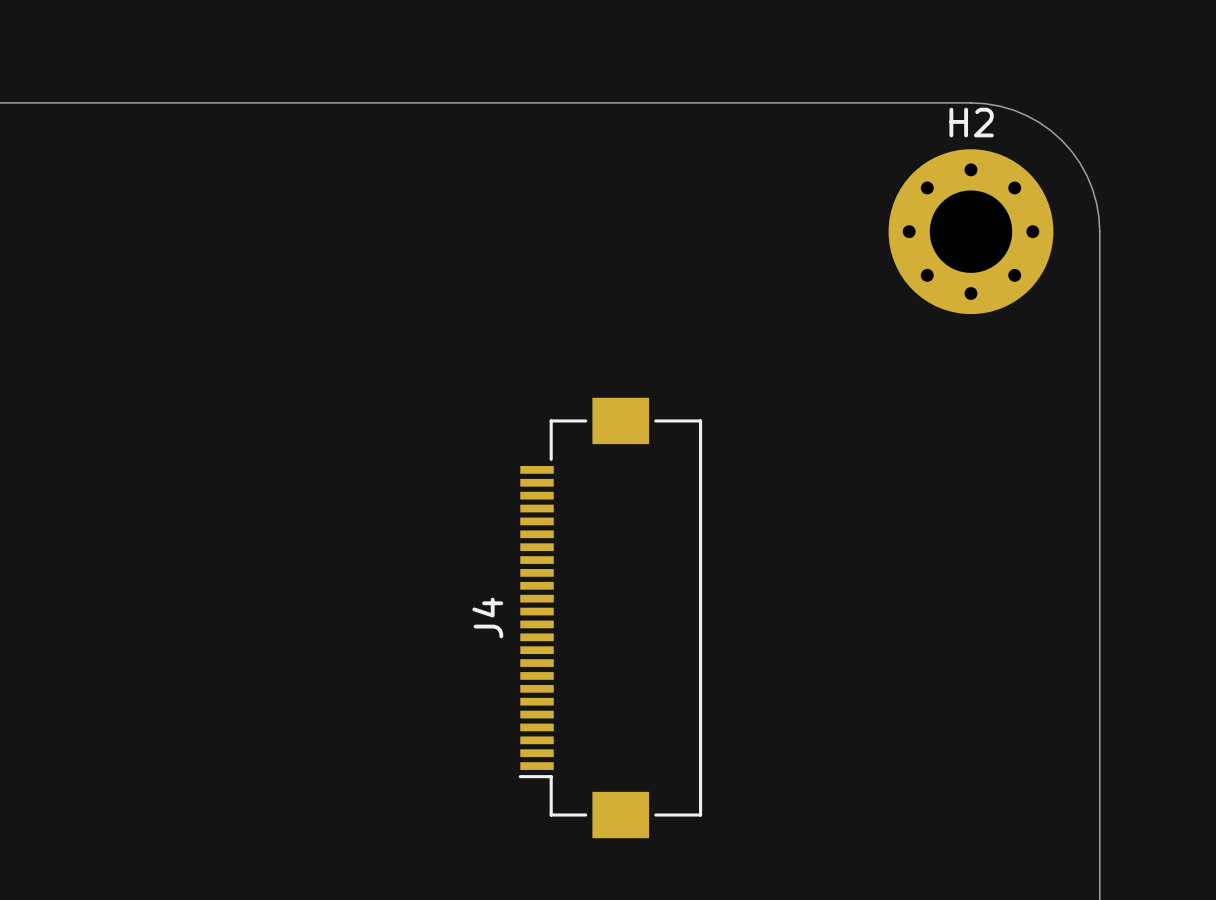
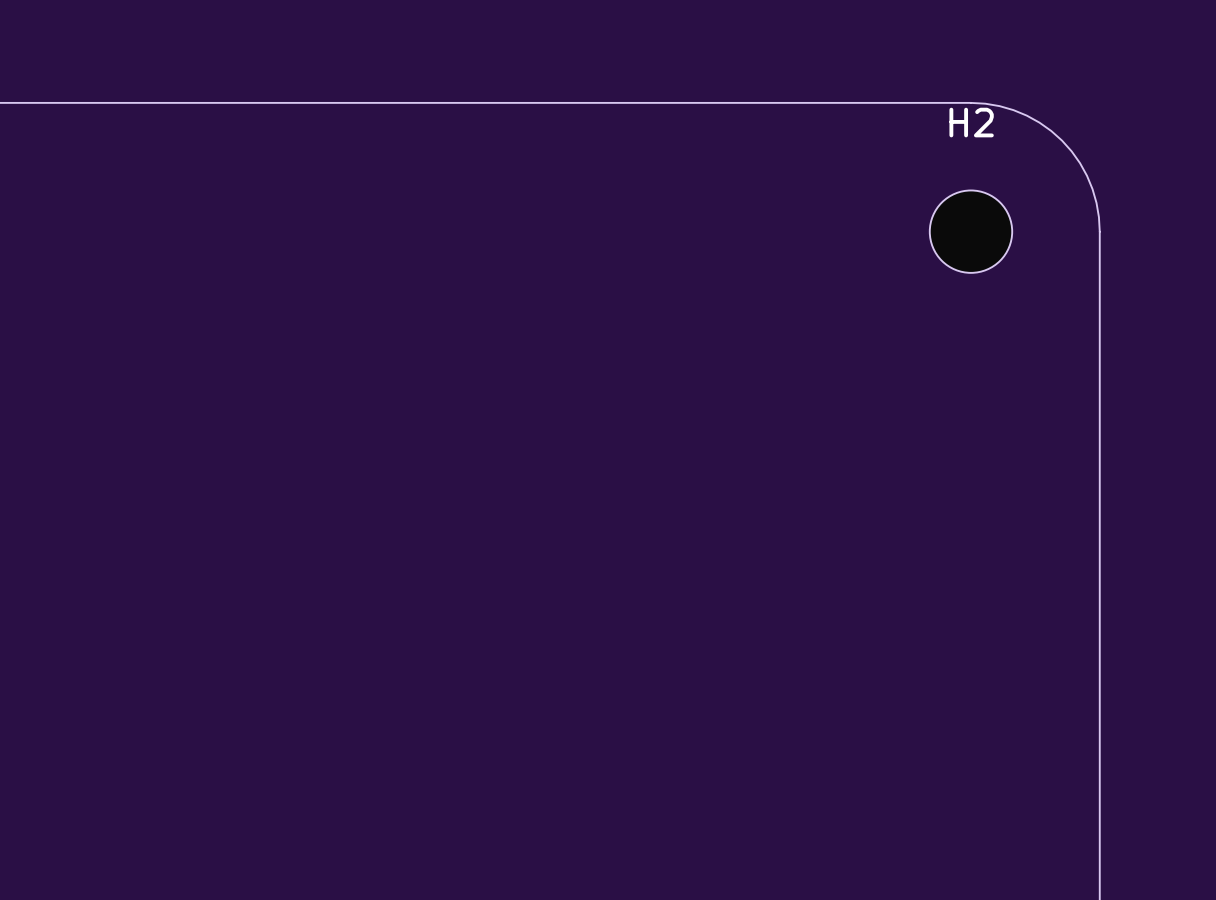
H2 footprint: [888, 149, 1054, 315] -> [929, 190, 1013, 273]
J4: (610, 617) -> none

